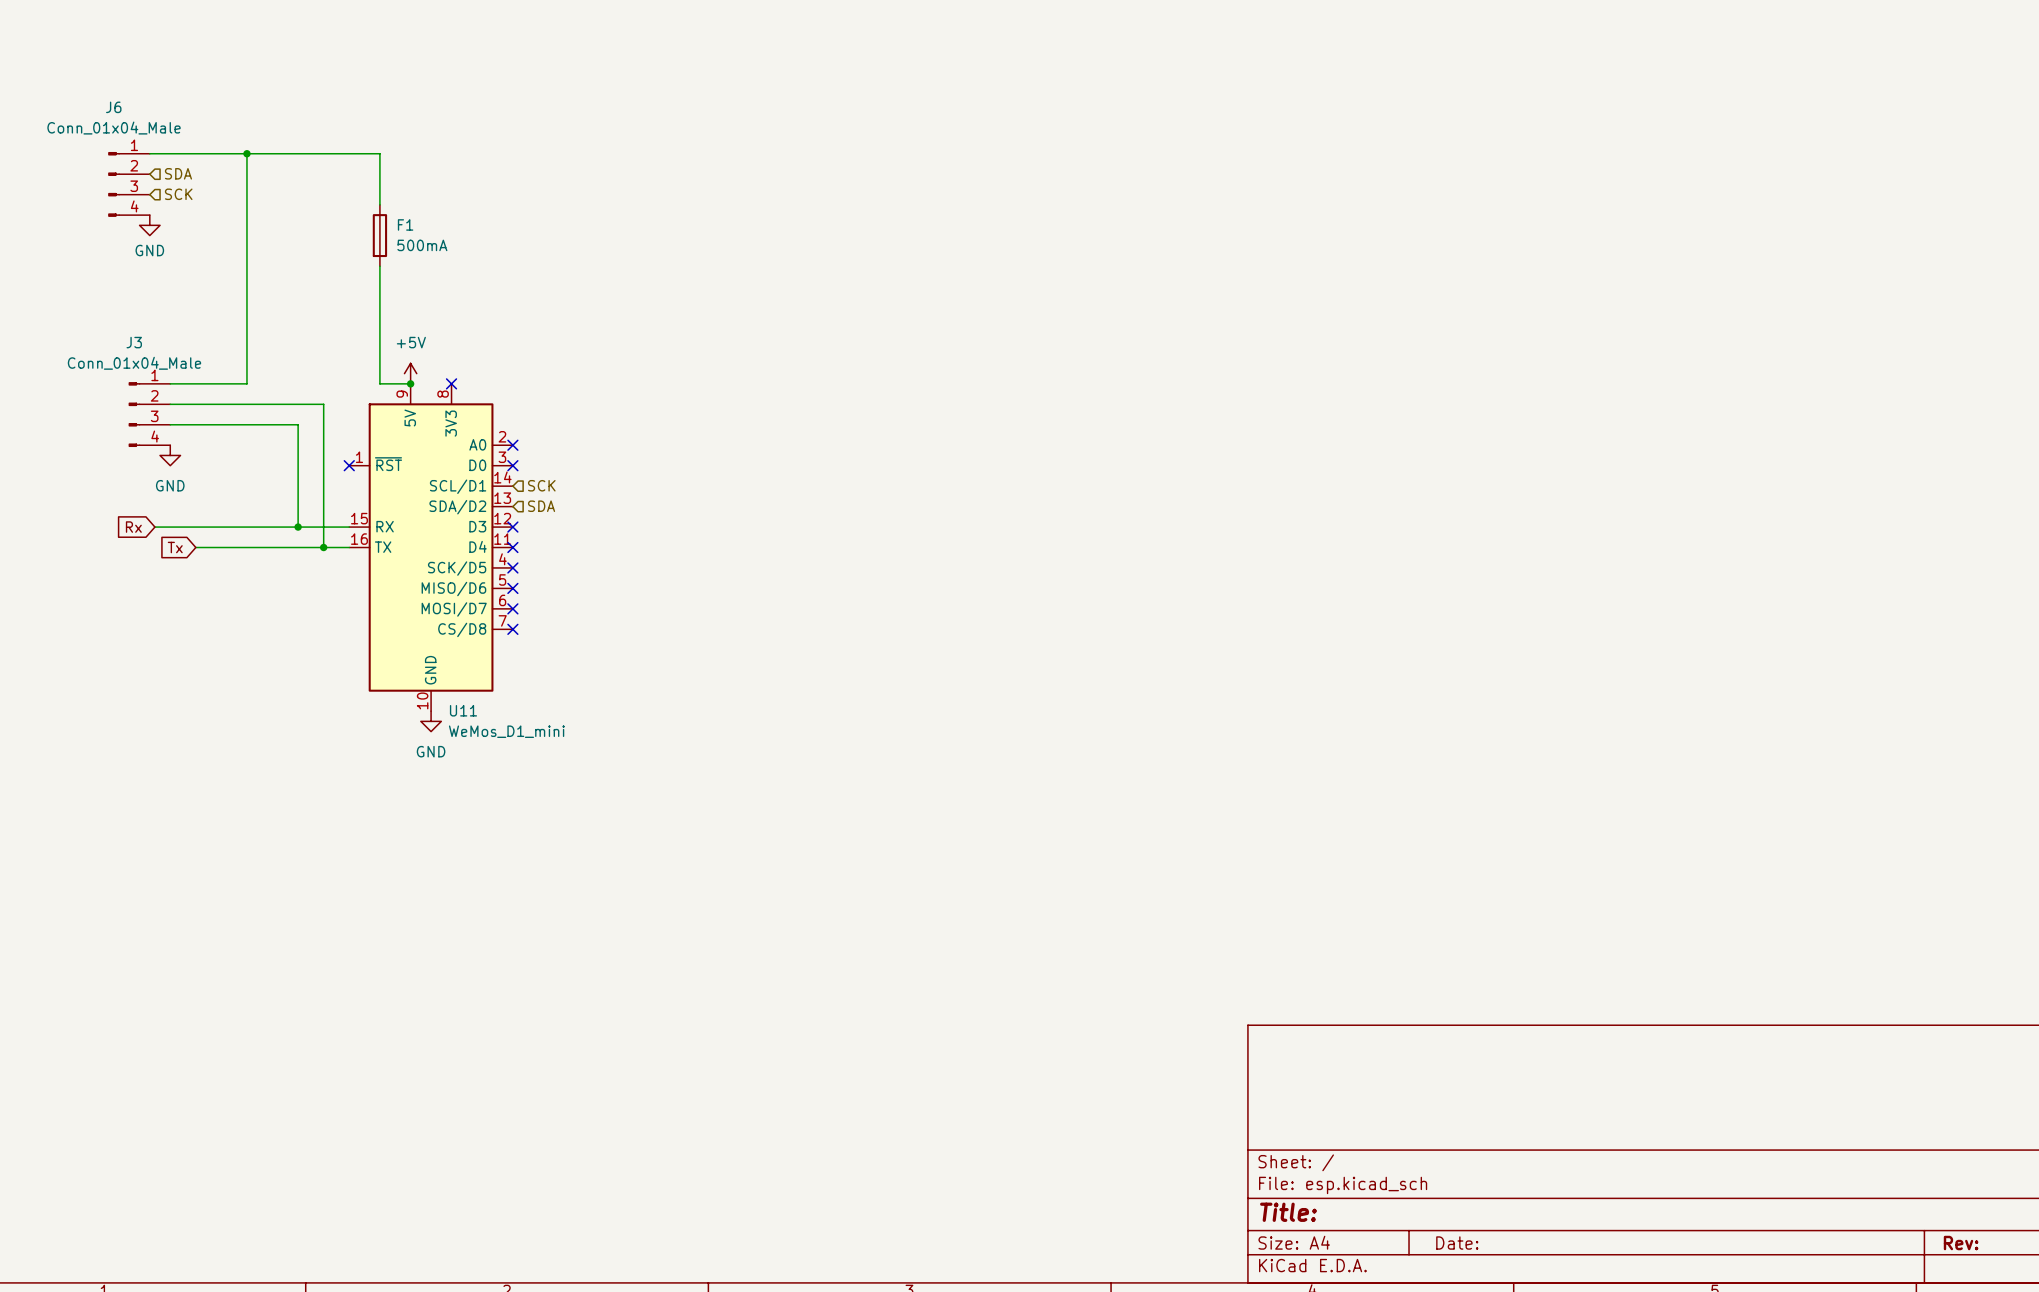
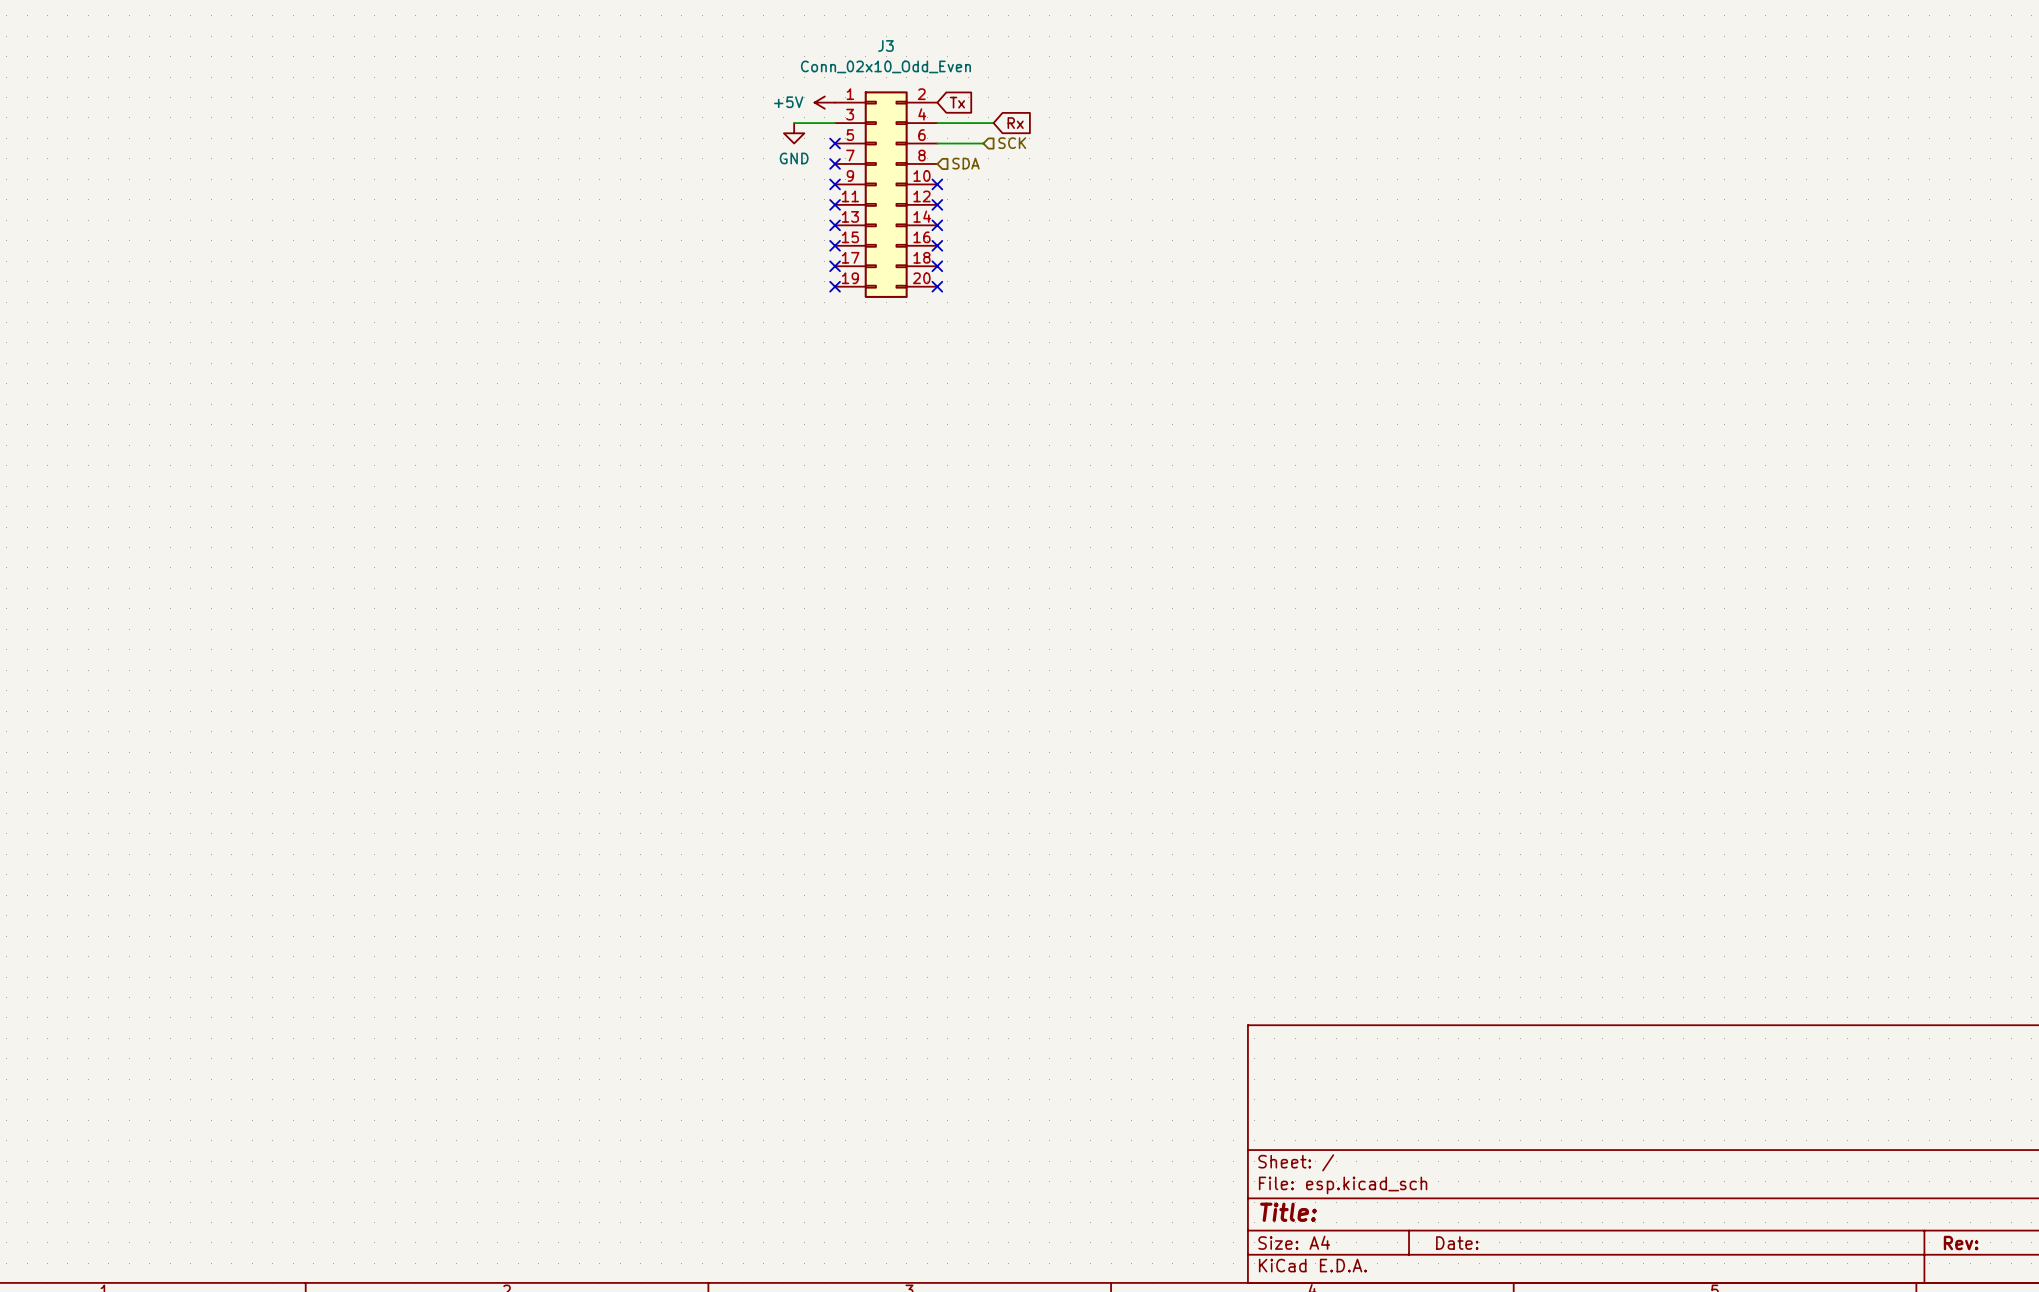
power symbol: none -> +5V (824, 102)
global label: none -> Tx (957, 102)
wire: none -> (794, 123) (835, 123)
wire: none -> (937, 123) (993, 123)
global label: none -> Rx (1015, 123)
power symbol: none -> GND (794, 133)
no-connect mark: none -> (835, 143)
wire: none -> (937, 143) (983, 143)
hierarchical label: none -> SCK (1012, 143)
wire: (149, 153) (379, 153) (379, 204) -> none
wire: (246, 153) (246, 383) (170, 383) -> none
junction: (246, 153) -> none
no-connect mark: none -> (835, 163)
hierarchical label: none -> SDA (965, 163)
hierarchical label: SDA (178, 173) -> none
J6: Conn_01x04_Male (129, 184) -> none
no-connect mark: none -> (835, 184)
no-connect mark: none -> (937, 184)
hierarchical label: SCK (178, 194) -> none
no-connect mark: none -> (835, 204)
no-connect mark: none -> (937, 204)
power symbol: GND (149, 225) -> none
no-connect mark: none -> (835, 225)
no-connect mark: none -> (937, 225)
F1: 500mA (379, 235) -> none
no-connect mark: none -> (835, 245)
no-connect mark: none -> (937, 245)
wire: (379, 266) (379, 383) (410, 383) -> none
no-connect mark: none -> (835, 266)
no-connect mark: none -> (937, 266)
no-connect mark: none -> (835, 286)
no-connect mark: none -> (937, 286)
J3 name position: J3 (134, 342) -> J3 (885, 45)
J3 value: Conn_01x04_Male (134, 363) -> Conn_02x10_Odd_Even (885, 66)
power symbol: +5V (410, 373) -> none
J3 symbol: [128, 382, 171, 447] -> [835, 91, 938, 298]
junction: (410, 383) -> none
no-connect mark: (451, 383) -> none
wire: (170, 404) (323, 404) (323, 547) -> none
wire: (170, 424) (298, 424) (298, 527) -> none
no-connect mark: (512, 445) -> none
power symbol: GND (170, 455) -> none
no-connect mark: (349, 465) -> none
no-connect mark: (512, 465) -> none
hierarchical label: SCK (541, 485) -> none
hierarchical label: SDA (541, 506) -> none
global label: Rx (133, 527) -> none
wire: (154, 527) (349, 527) -> none
junction: (298, 527) -> none
no-connect mark: (512, 527) -> none
global label: Tx (175, 547) -> none
wire: (195, 547) (349, 547) -> none
junction: (323, 547) -> none
U11: WeMos_D1_mini (431, 547) -> none
no-connect mark: (512, 547) -> none
no-connect mark: (512, 567) -> none
no-connect mark: (512, 588) -> none
no-connect mark: (512, 608) -> none
no-connect mark: (512, 629) -> none
power symbol: GND (431, 721) -> none

